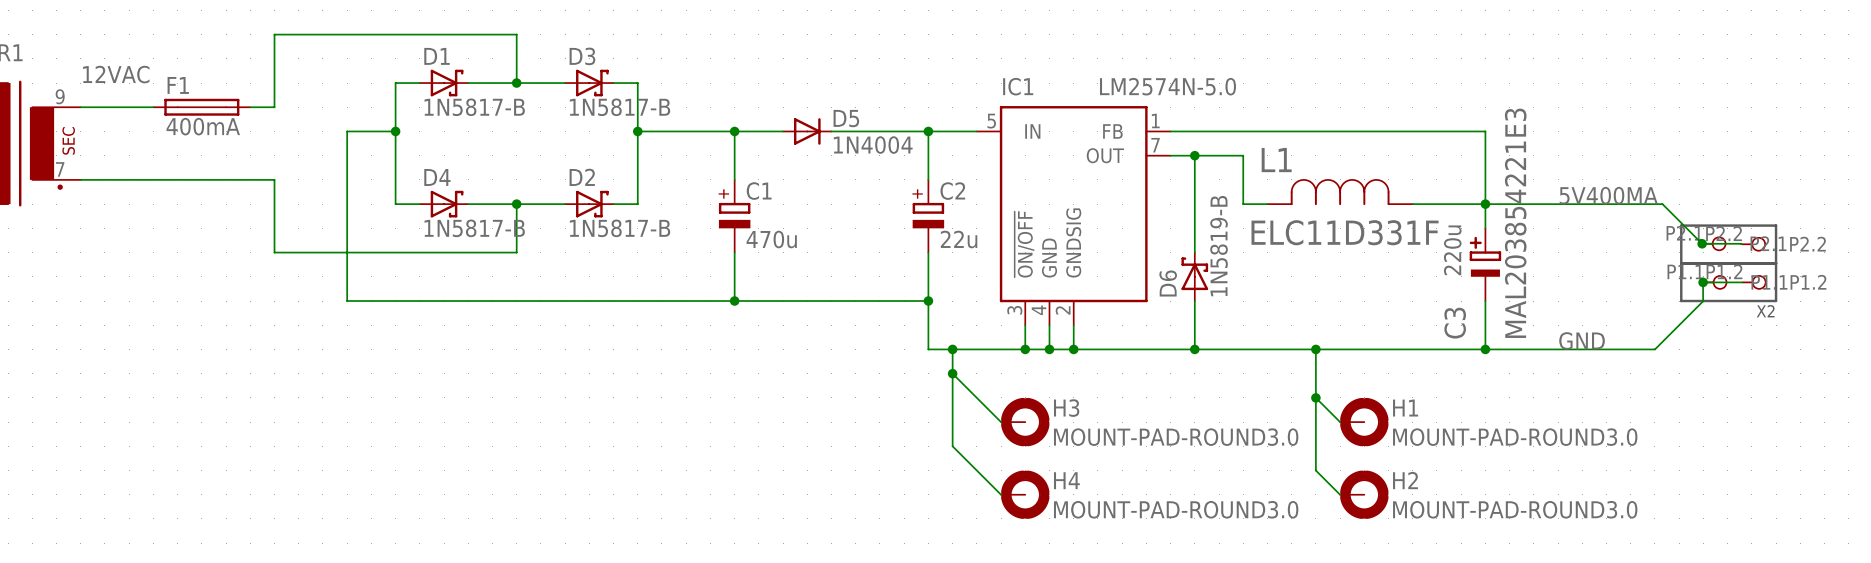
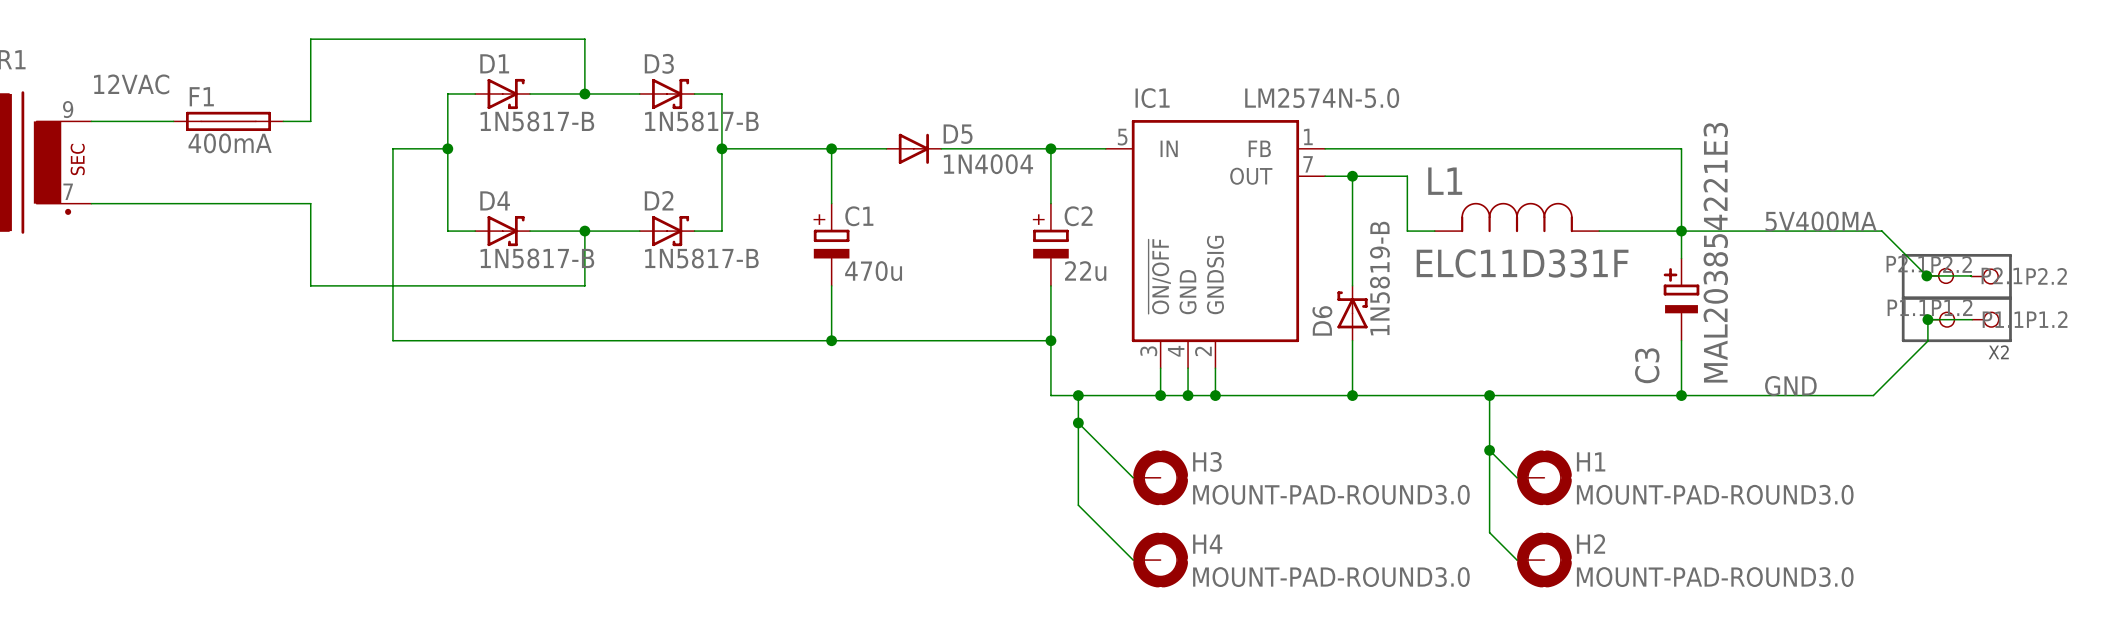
C3 text: 220u (1452, 250) -> none

